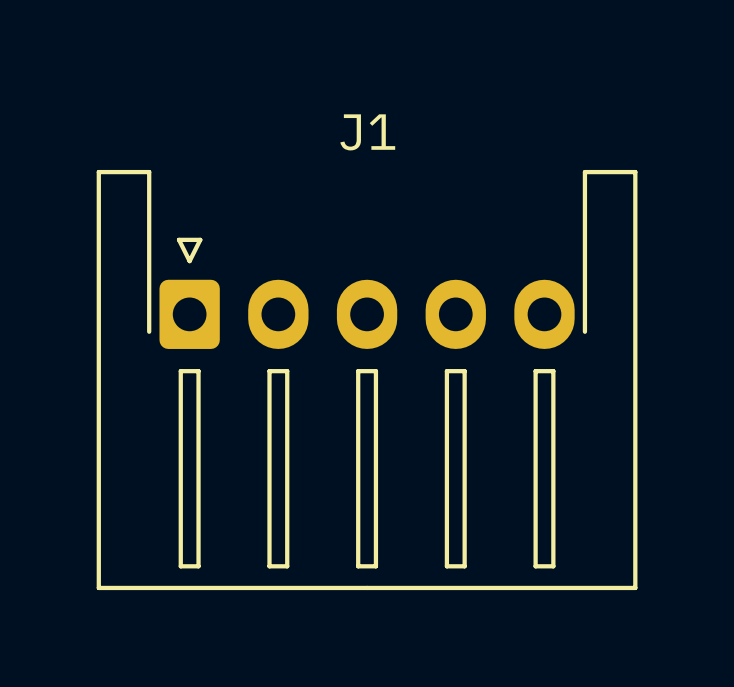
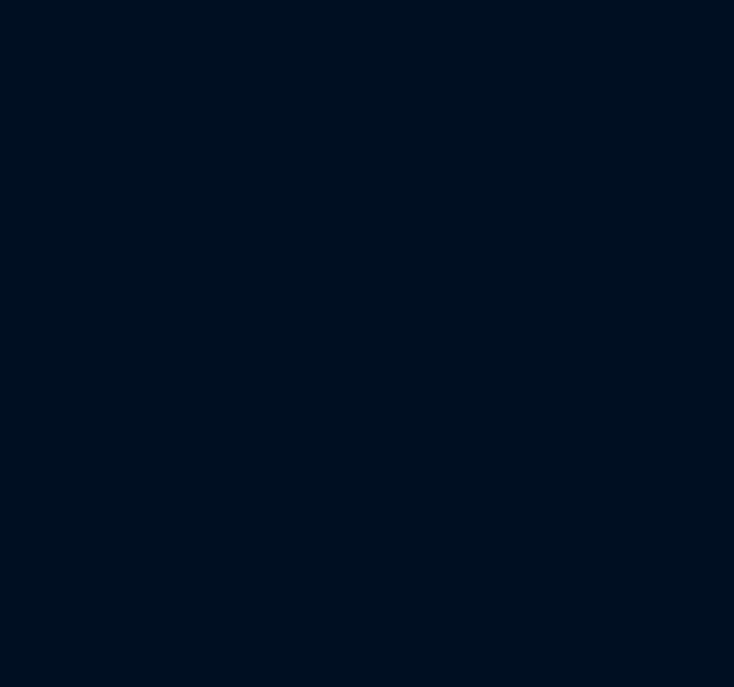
J1: (367, 380) -> none

